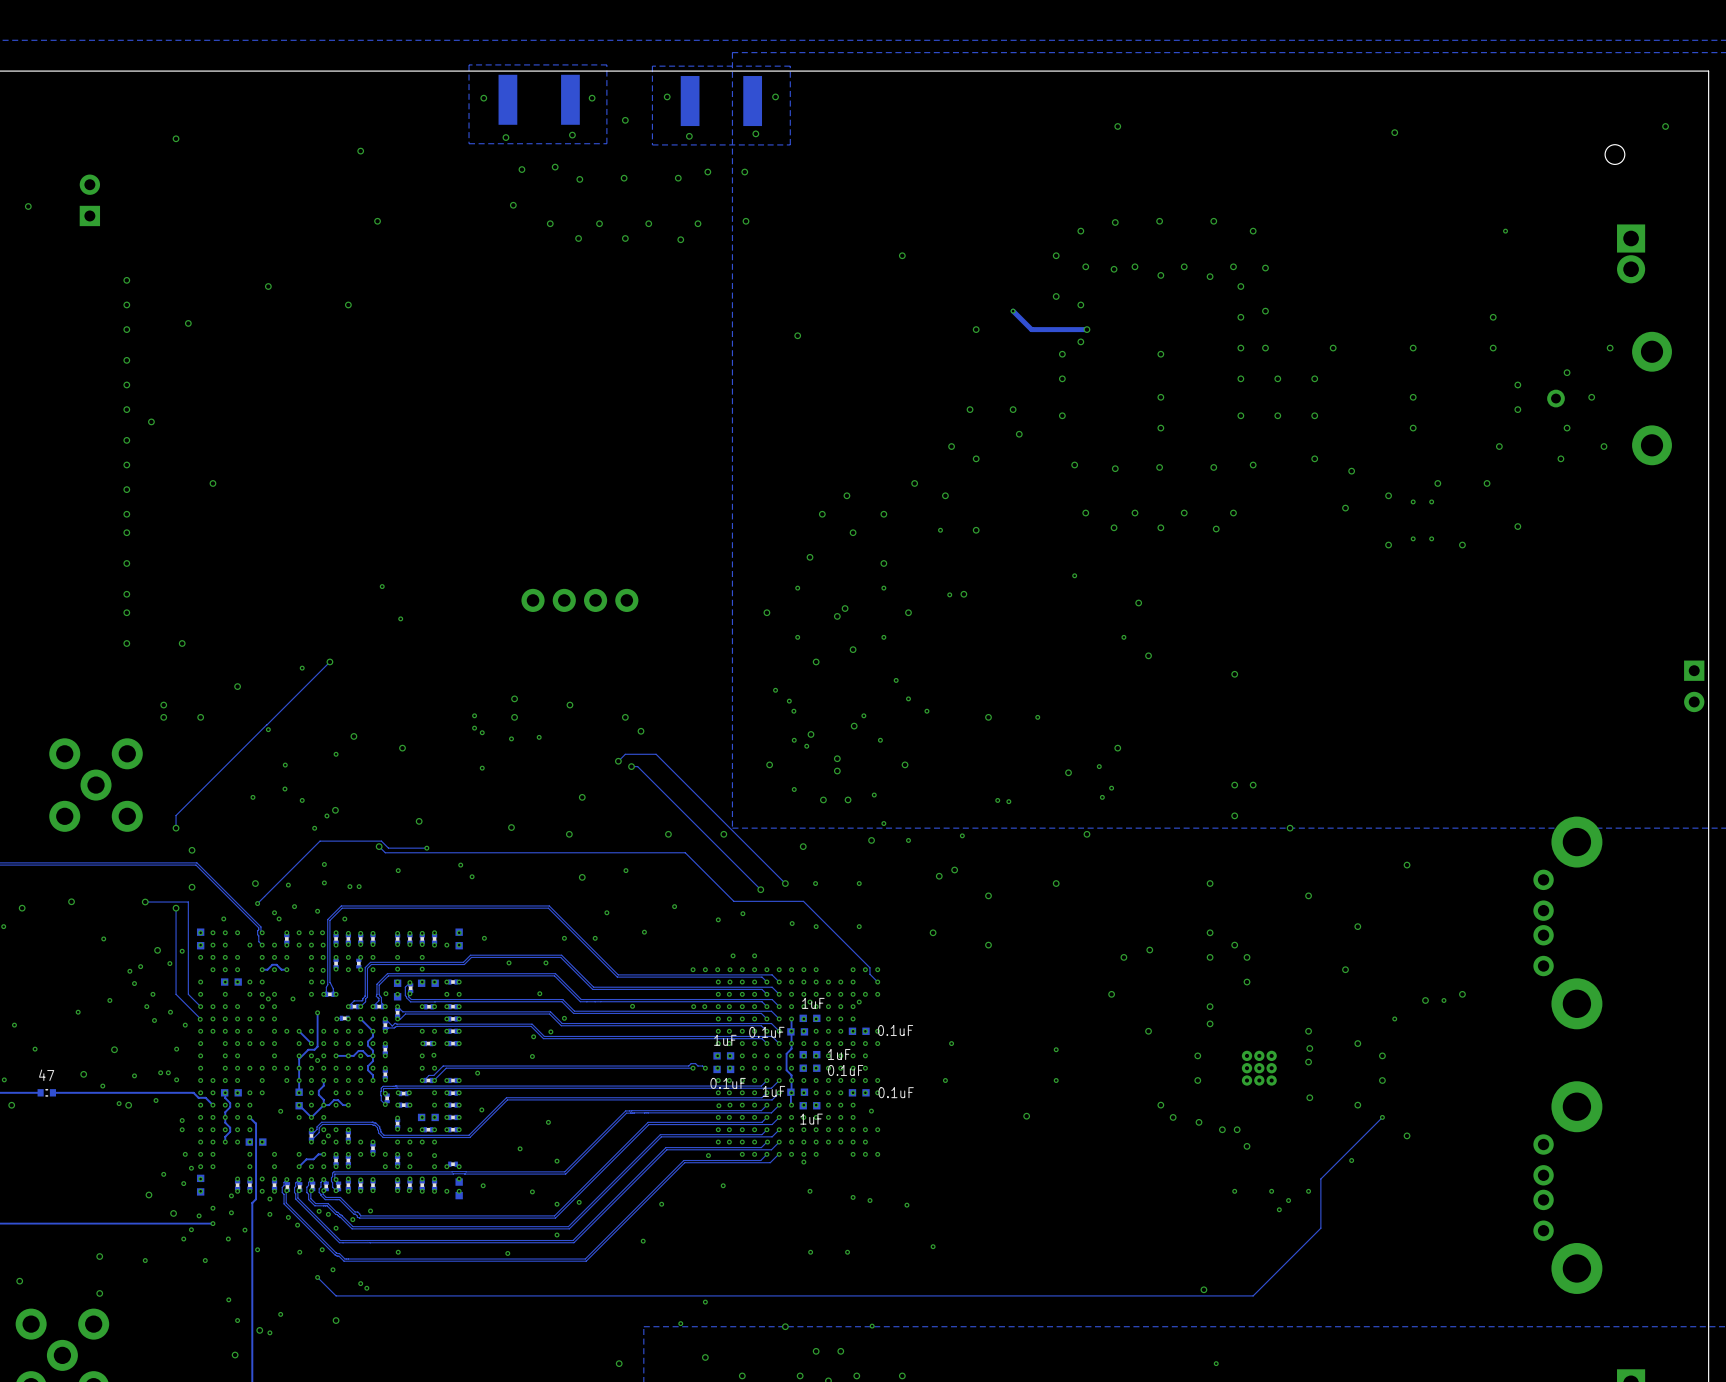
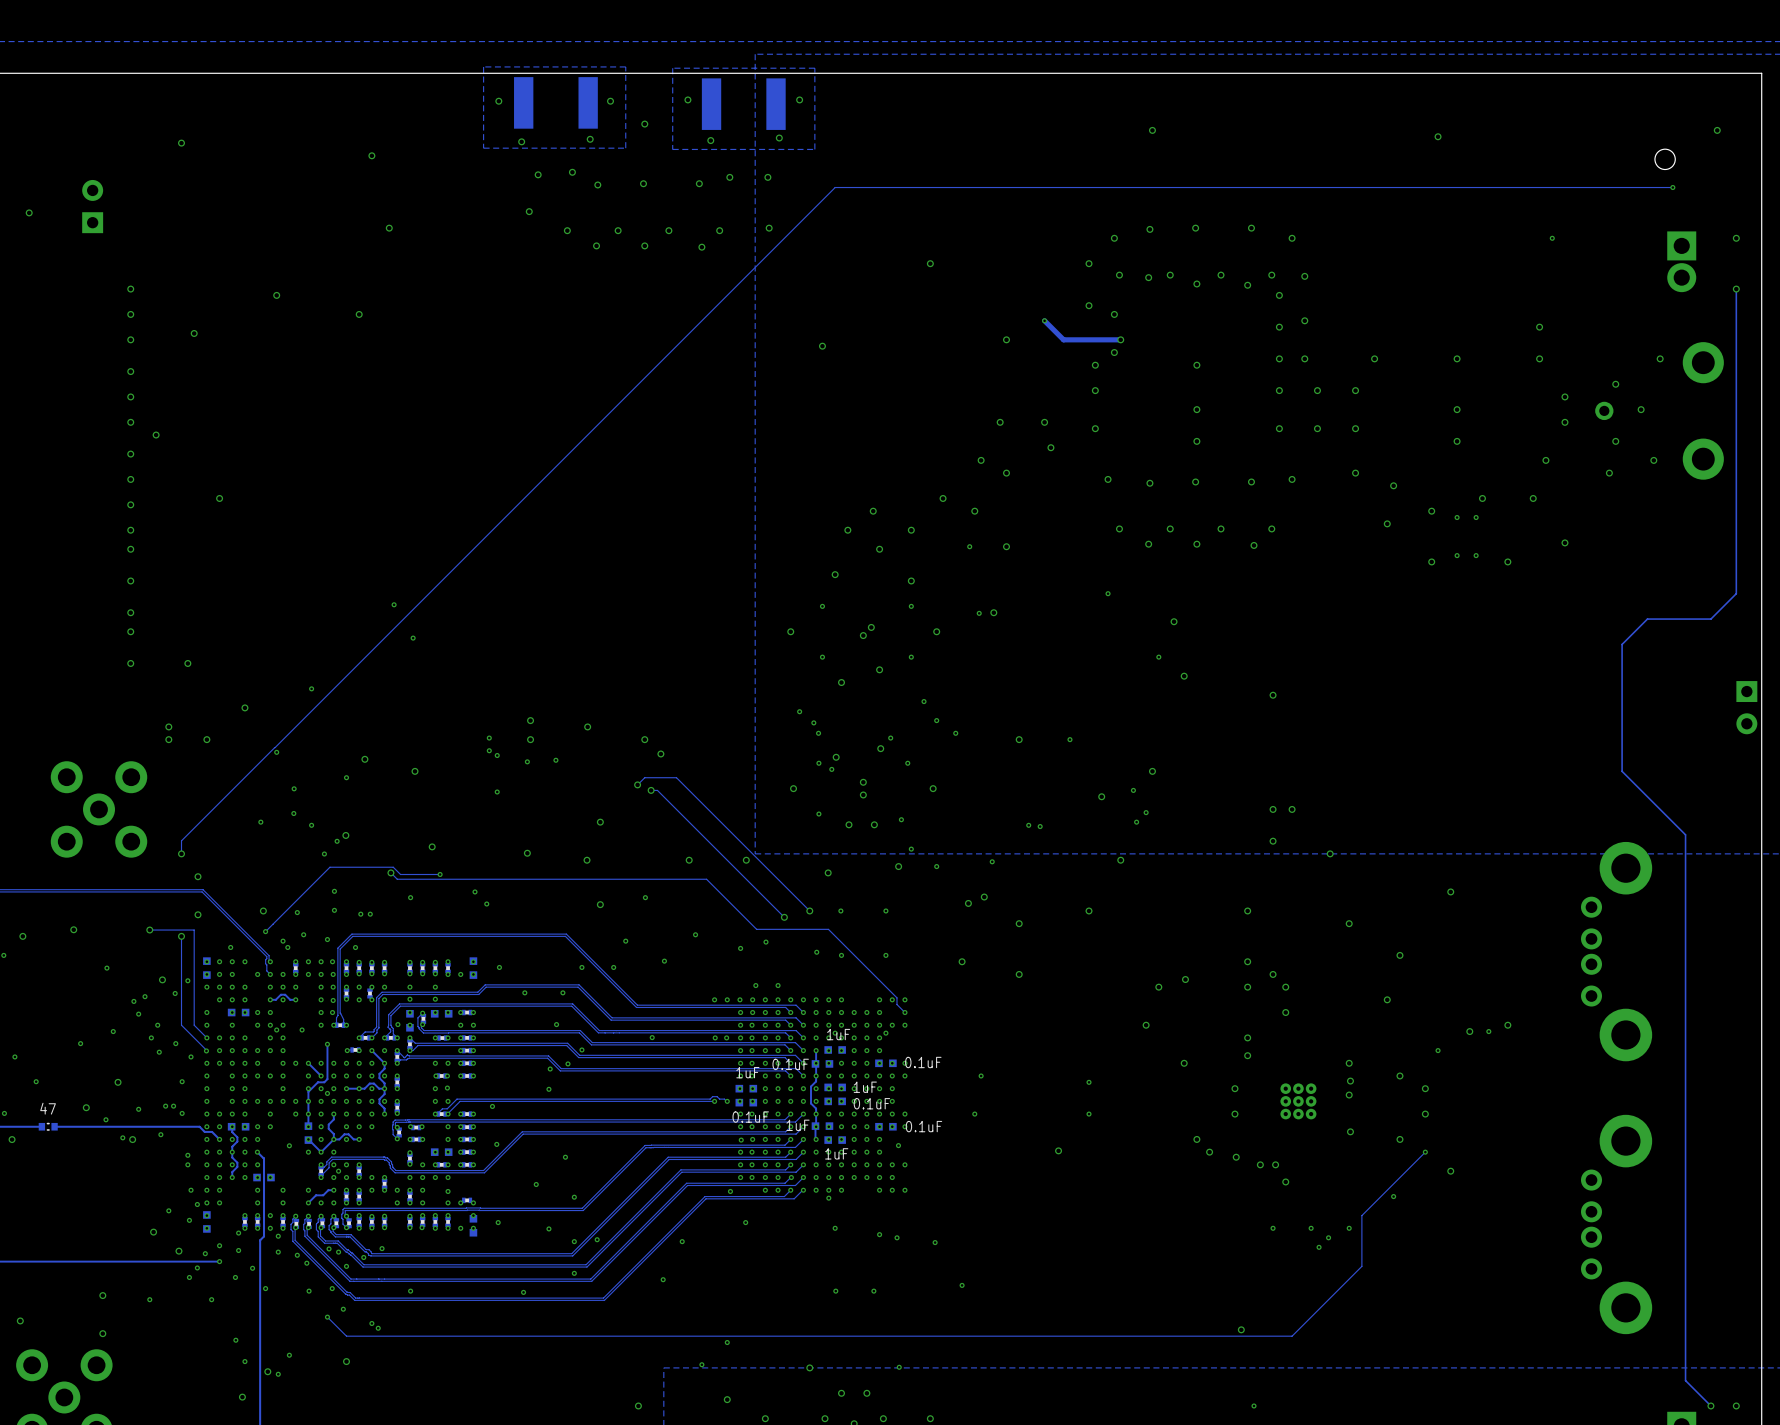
track: none -> (1672, 187) (835, 187) (340, 682)
via: none -> (1672, 187)
via: none -> (1736, 238)
track: none -> (1736, 289) (1736, 593) (1710, 619) (1647, 619) (1622, 644) (1622, 771) (1685, 834) (1685, 1380) (1710, 1405)
via: none -> (1736, 289)
part: (579, 600) -> none
via: (329, 661) -> none
via: none -> (1710, 1405)
via: none -> (1736, 1405)

